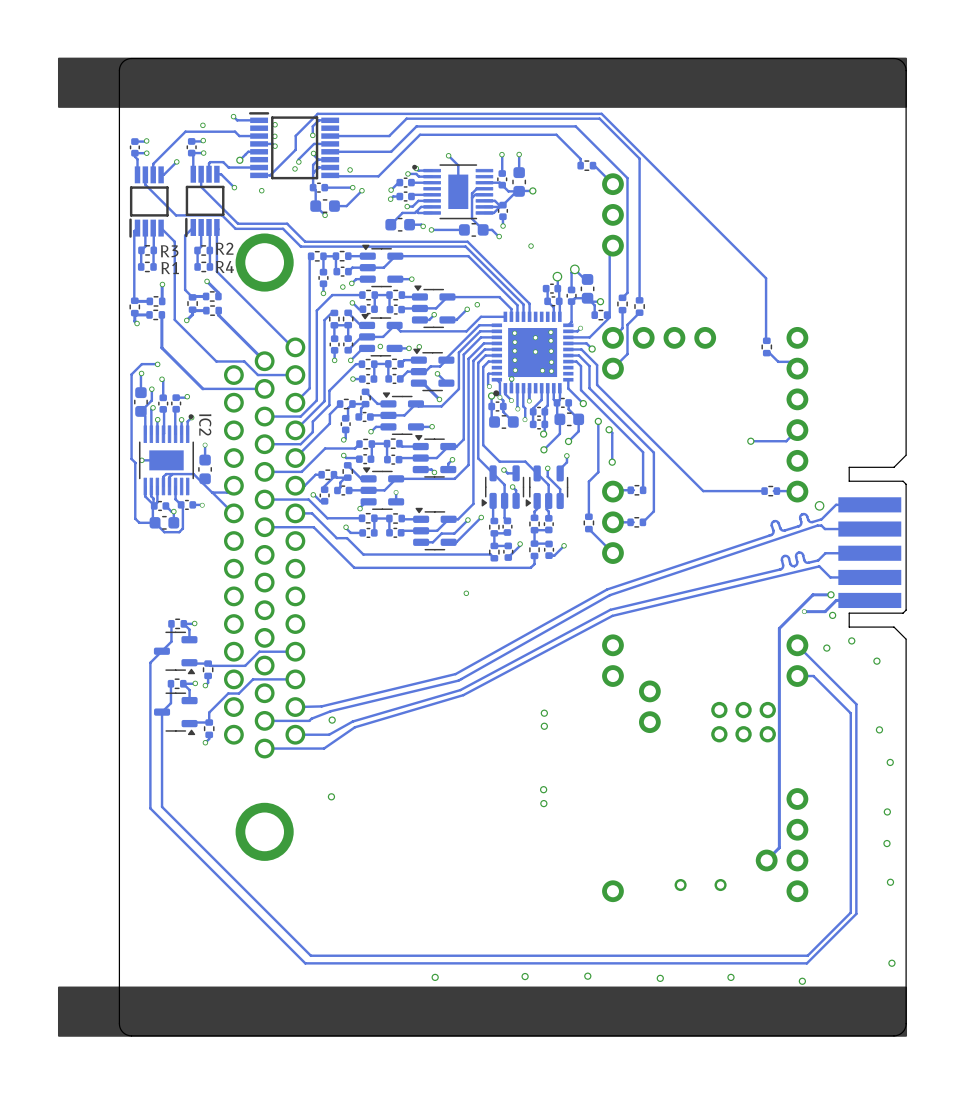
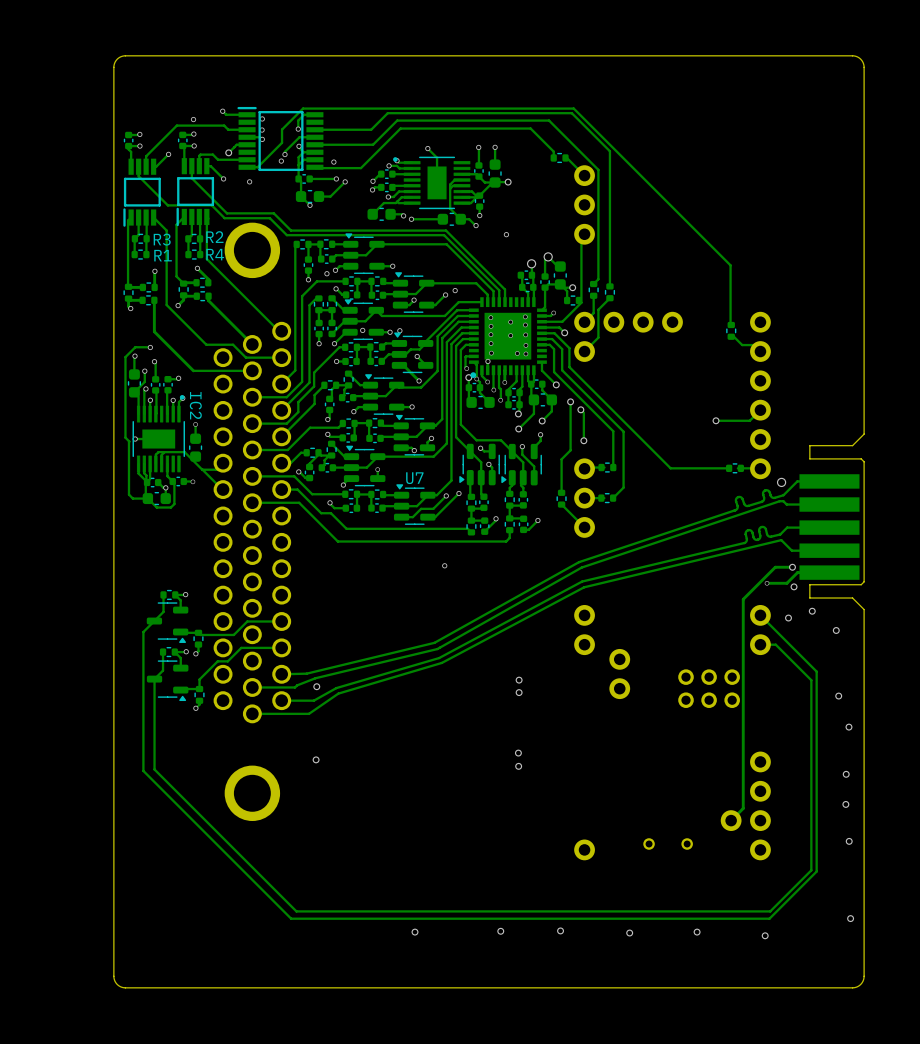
drawing: [57, 57, 908, 108] -> none
U7 name: none -> U7 (414, 478)
drawing: [57, 986, 908, 1037] -> none

